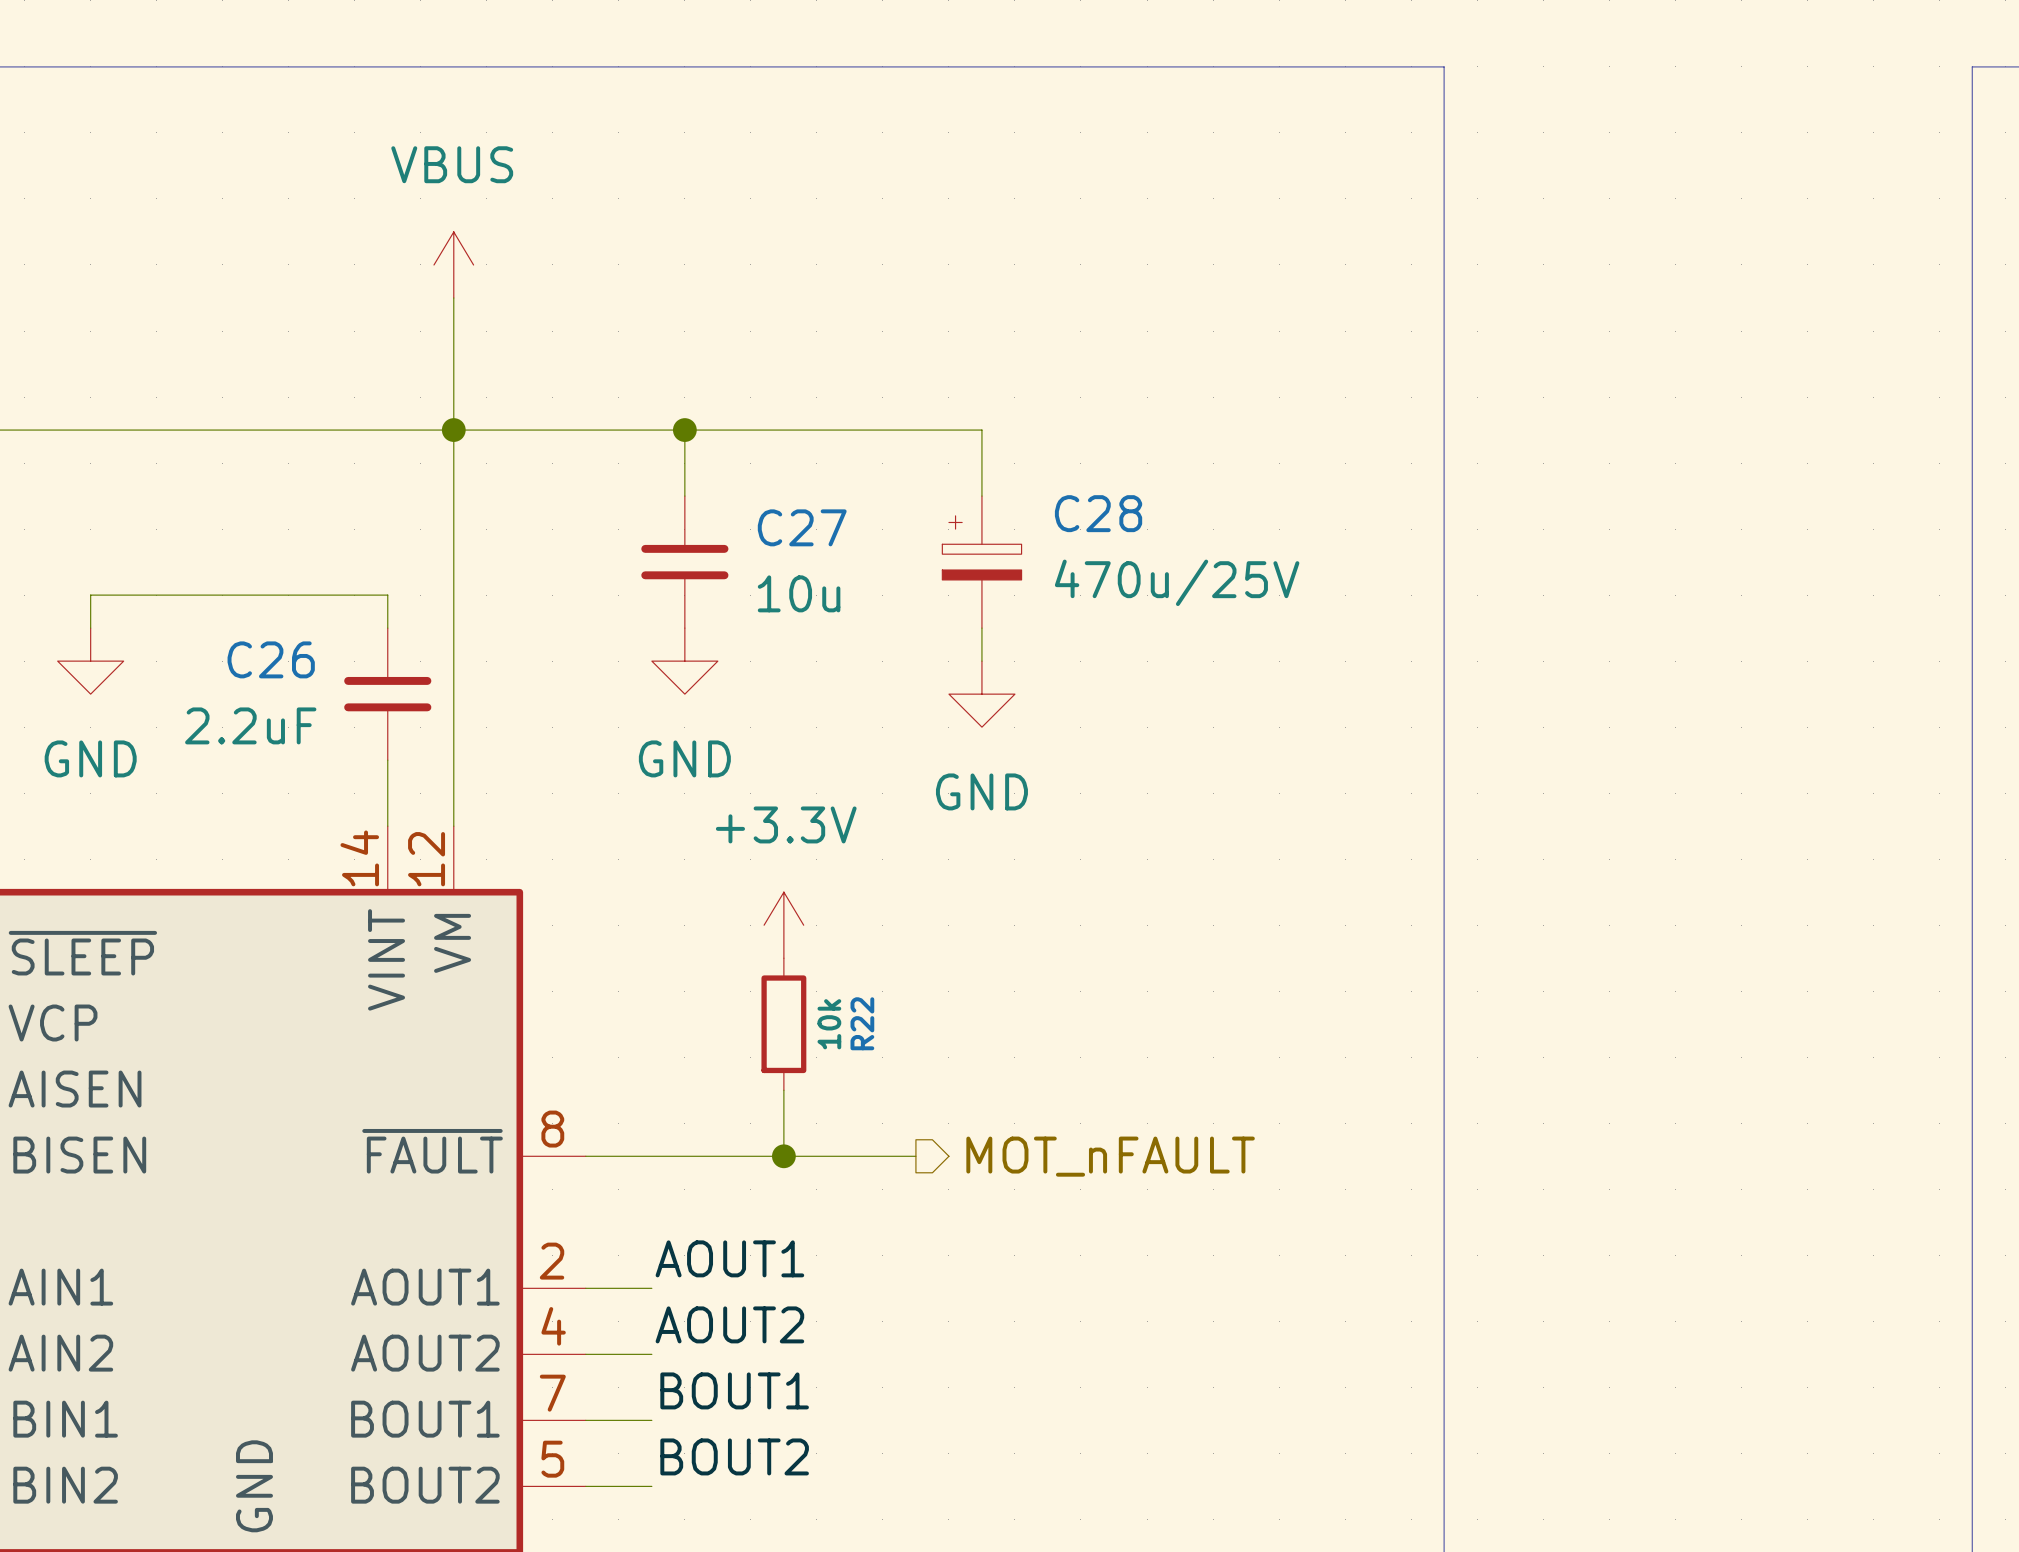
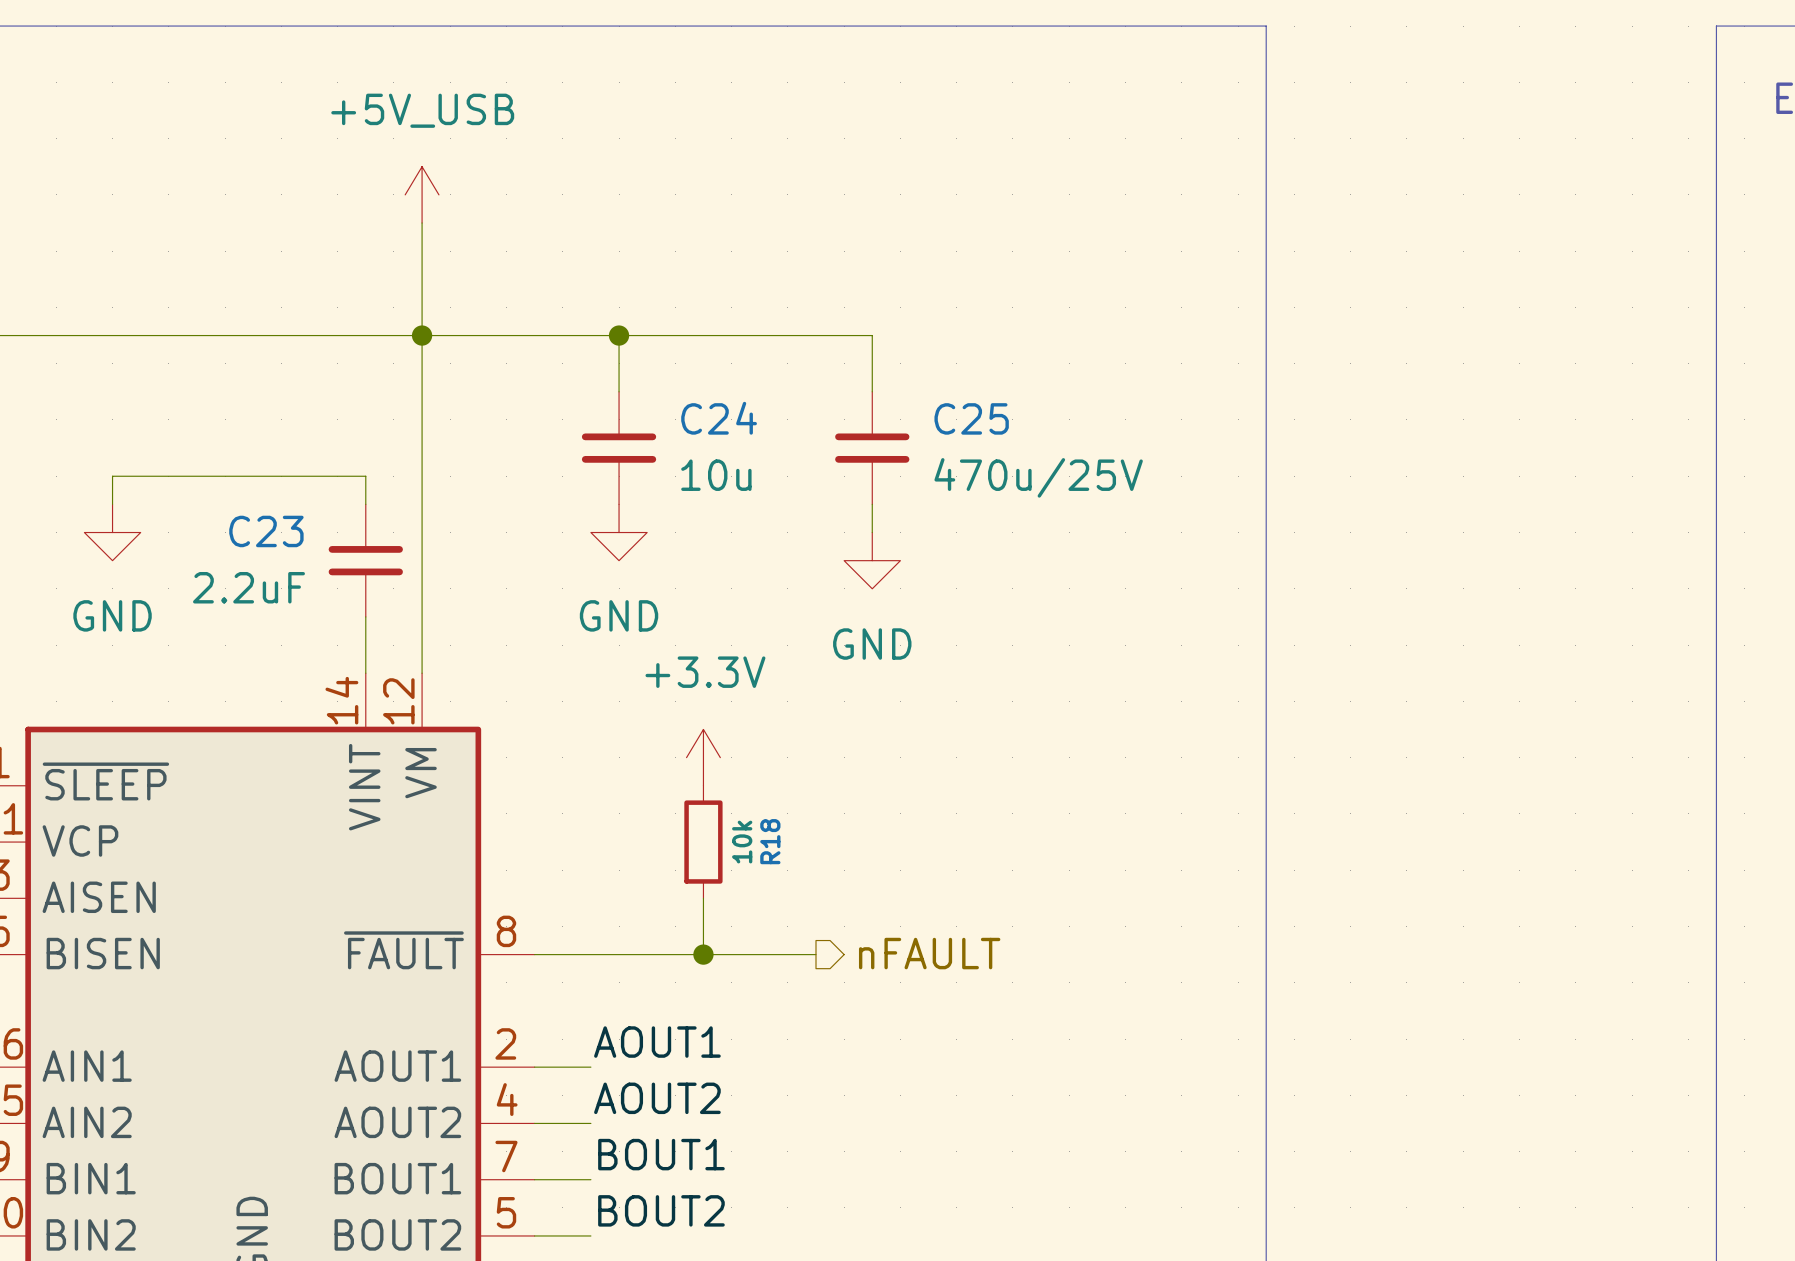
power symbol: VBUS (453, 264) -> +5V_USB (422, 194)
C27 name: C27 (802, 527) -> C24 (719, 418)
C28: 470u/25V (981, 562) -> none
C25: none -> 470u/25V (872, 448)
C26 name: C26 (271, 659) -> C23 (266, 531)
R22 name: R22 (862, 1023) -> R18 (770, 841)
hierarchical label: MOT_nFAULT (1110, 1156) -> nFAULT (929, 953)

